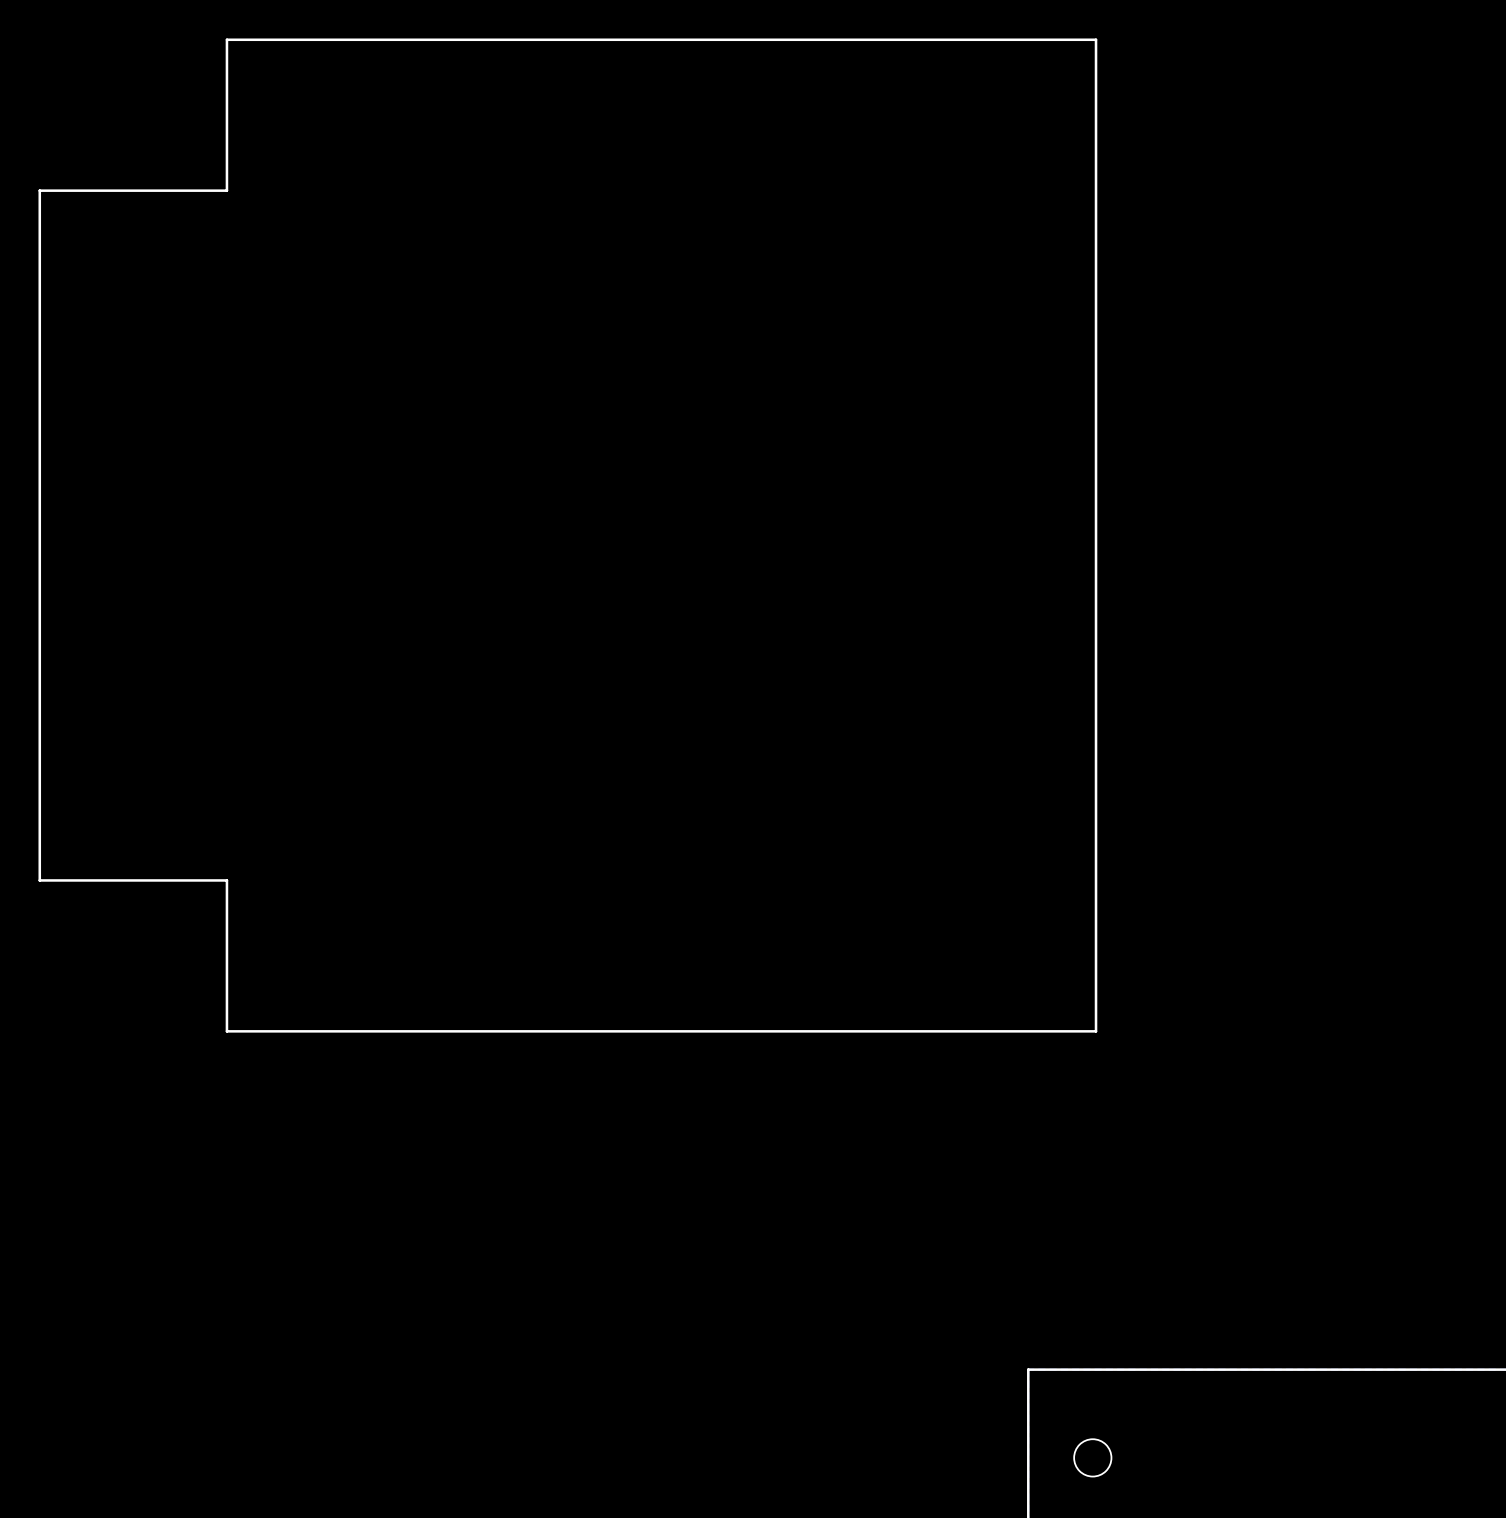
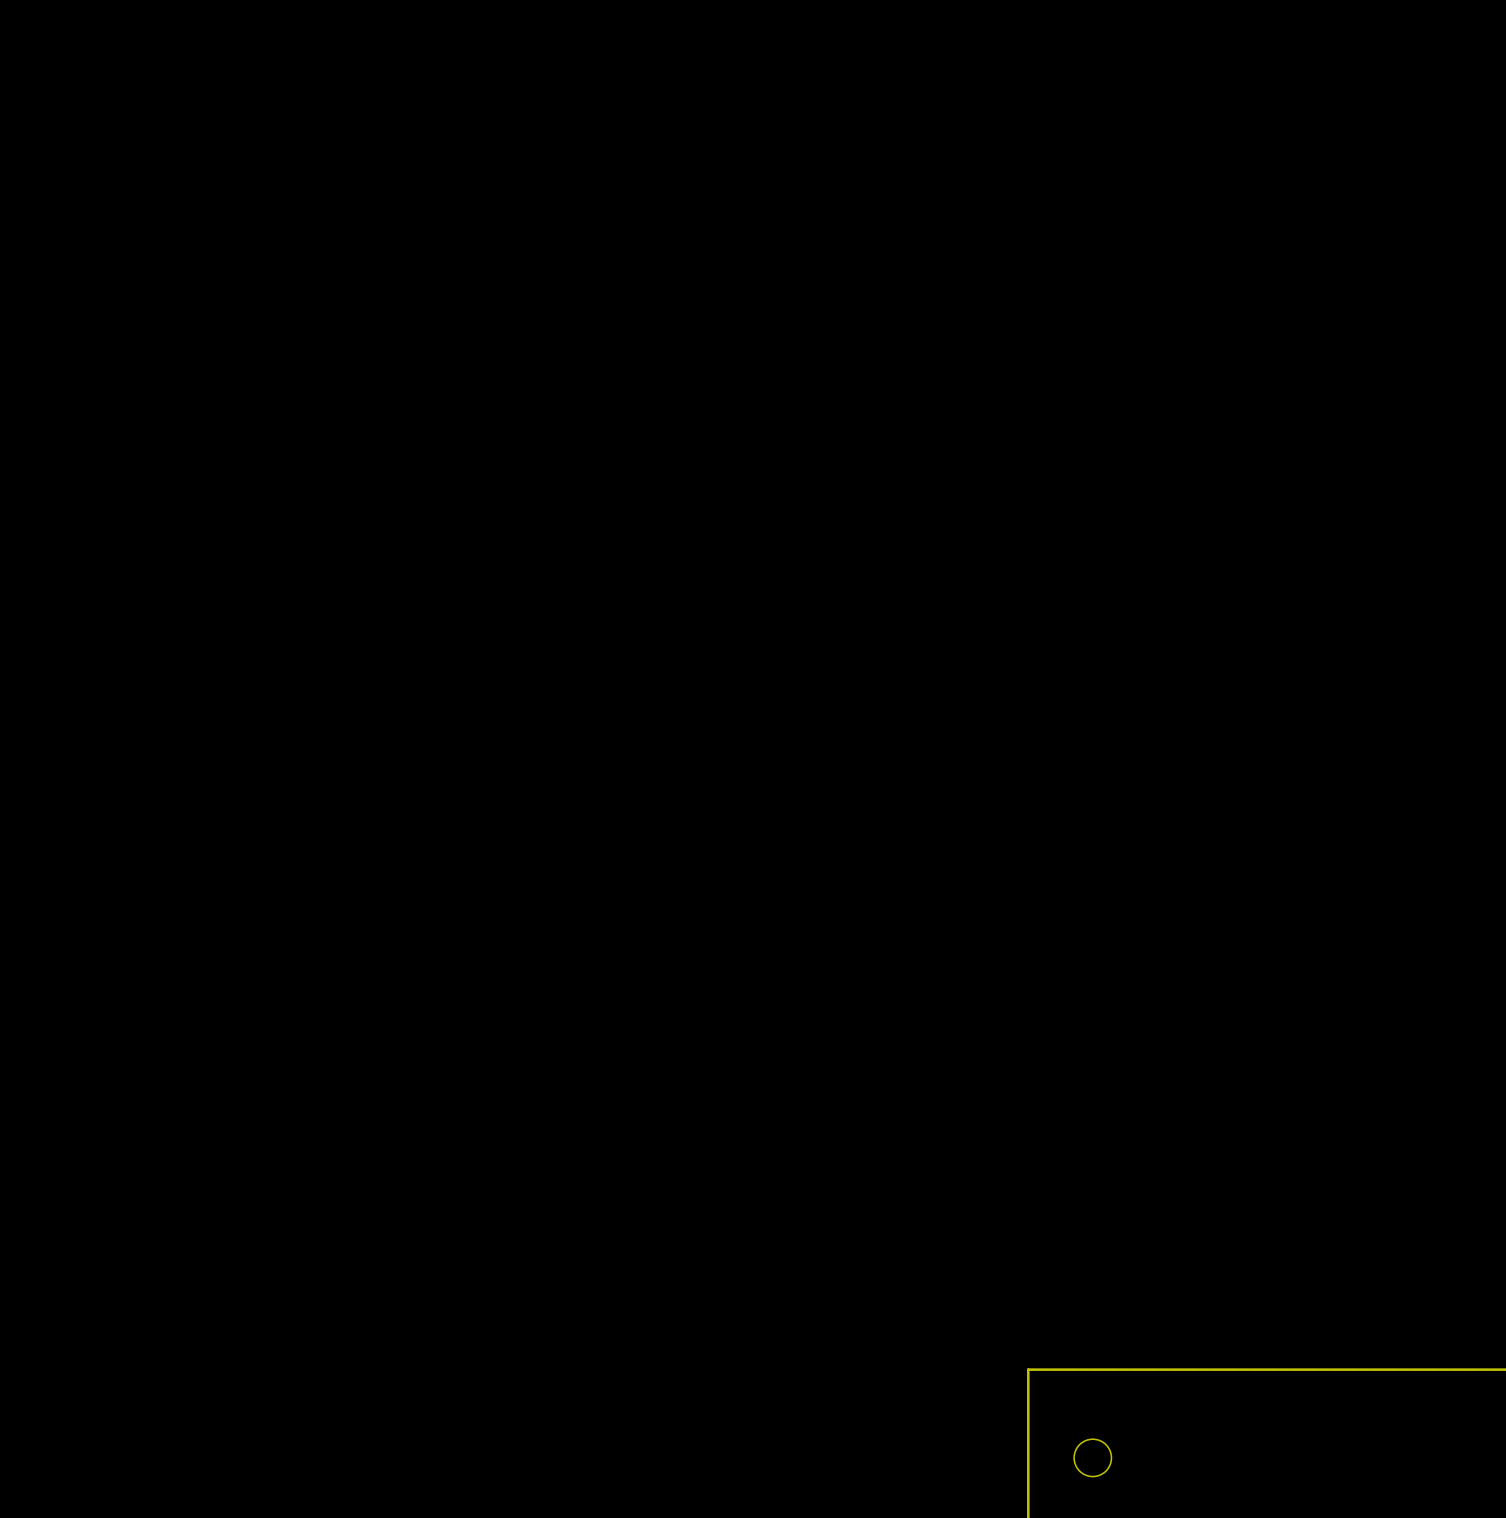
board edge: (1096, 39) (1096, 1031) (226, 1031) (226, 880) (39, 880) (39, 190) (226, 190) (226, 39) (1096, 39) -> none

